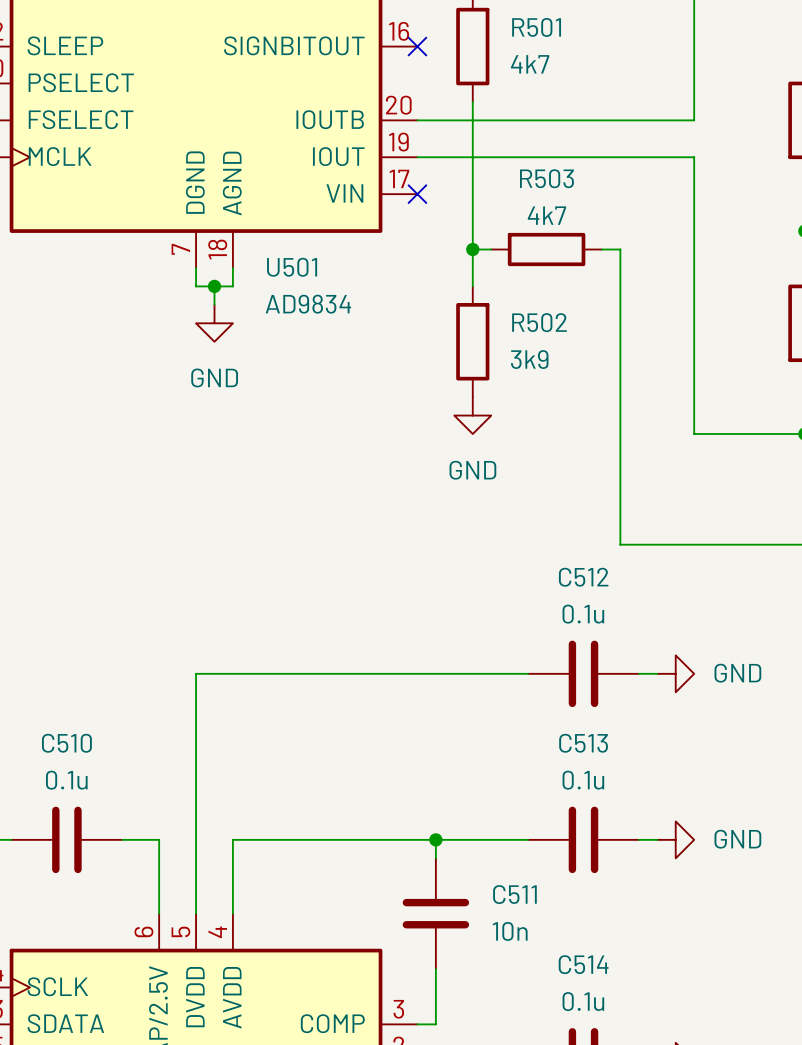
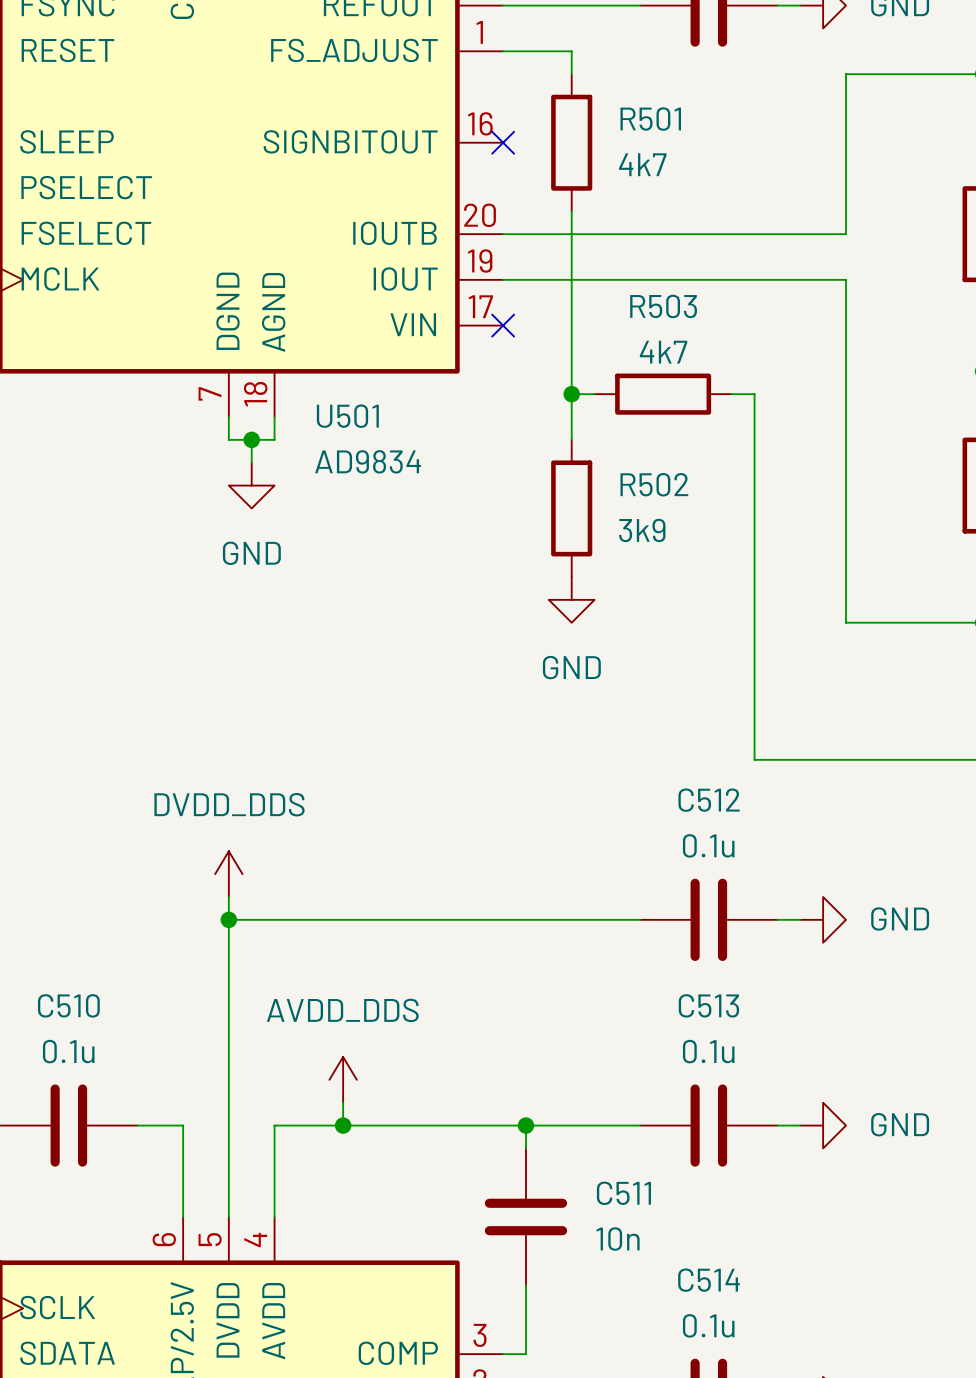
power symbol: none -> DVDD_DDS (228, 874)
wire: none -> (228, 897) (228, 919)
junction: none -> (228, 919)
power symbol: none -> AVDD_DDS (343, 1079)
wire: none -> (343, 1102) (343, 1125)
junction: none -> (343, 1125)

